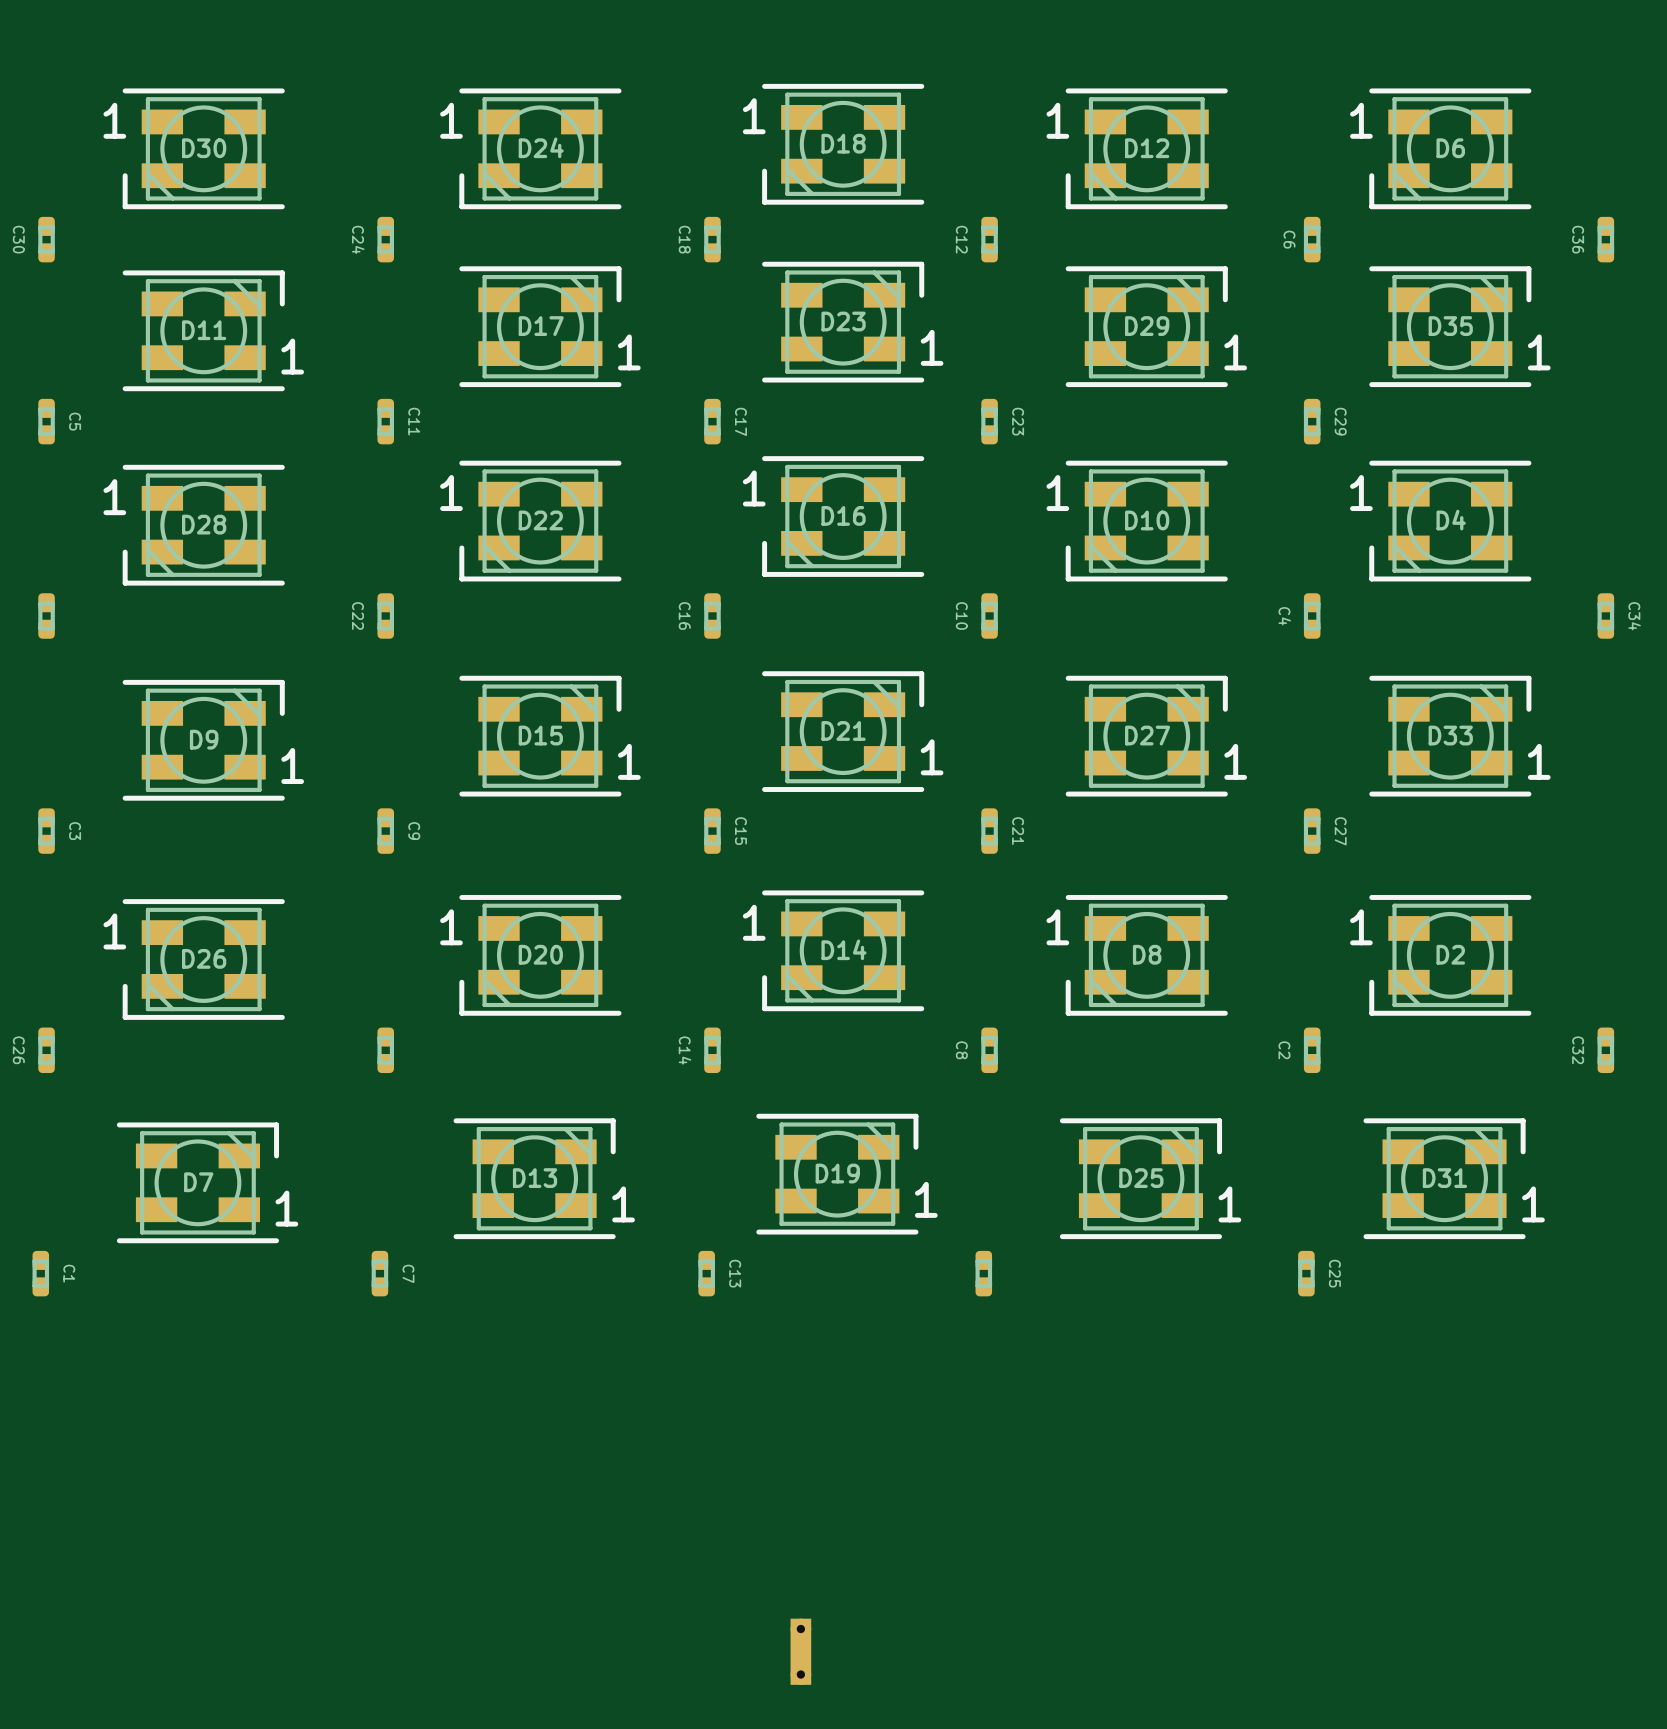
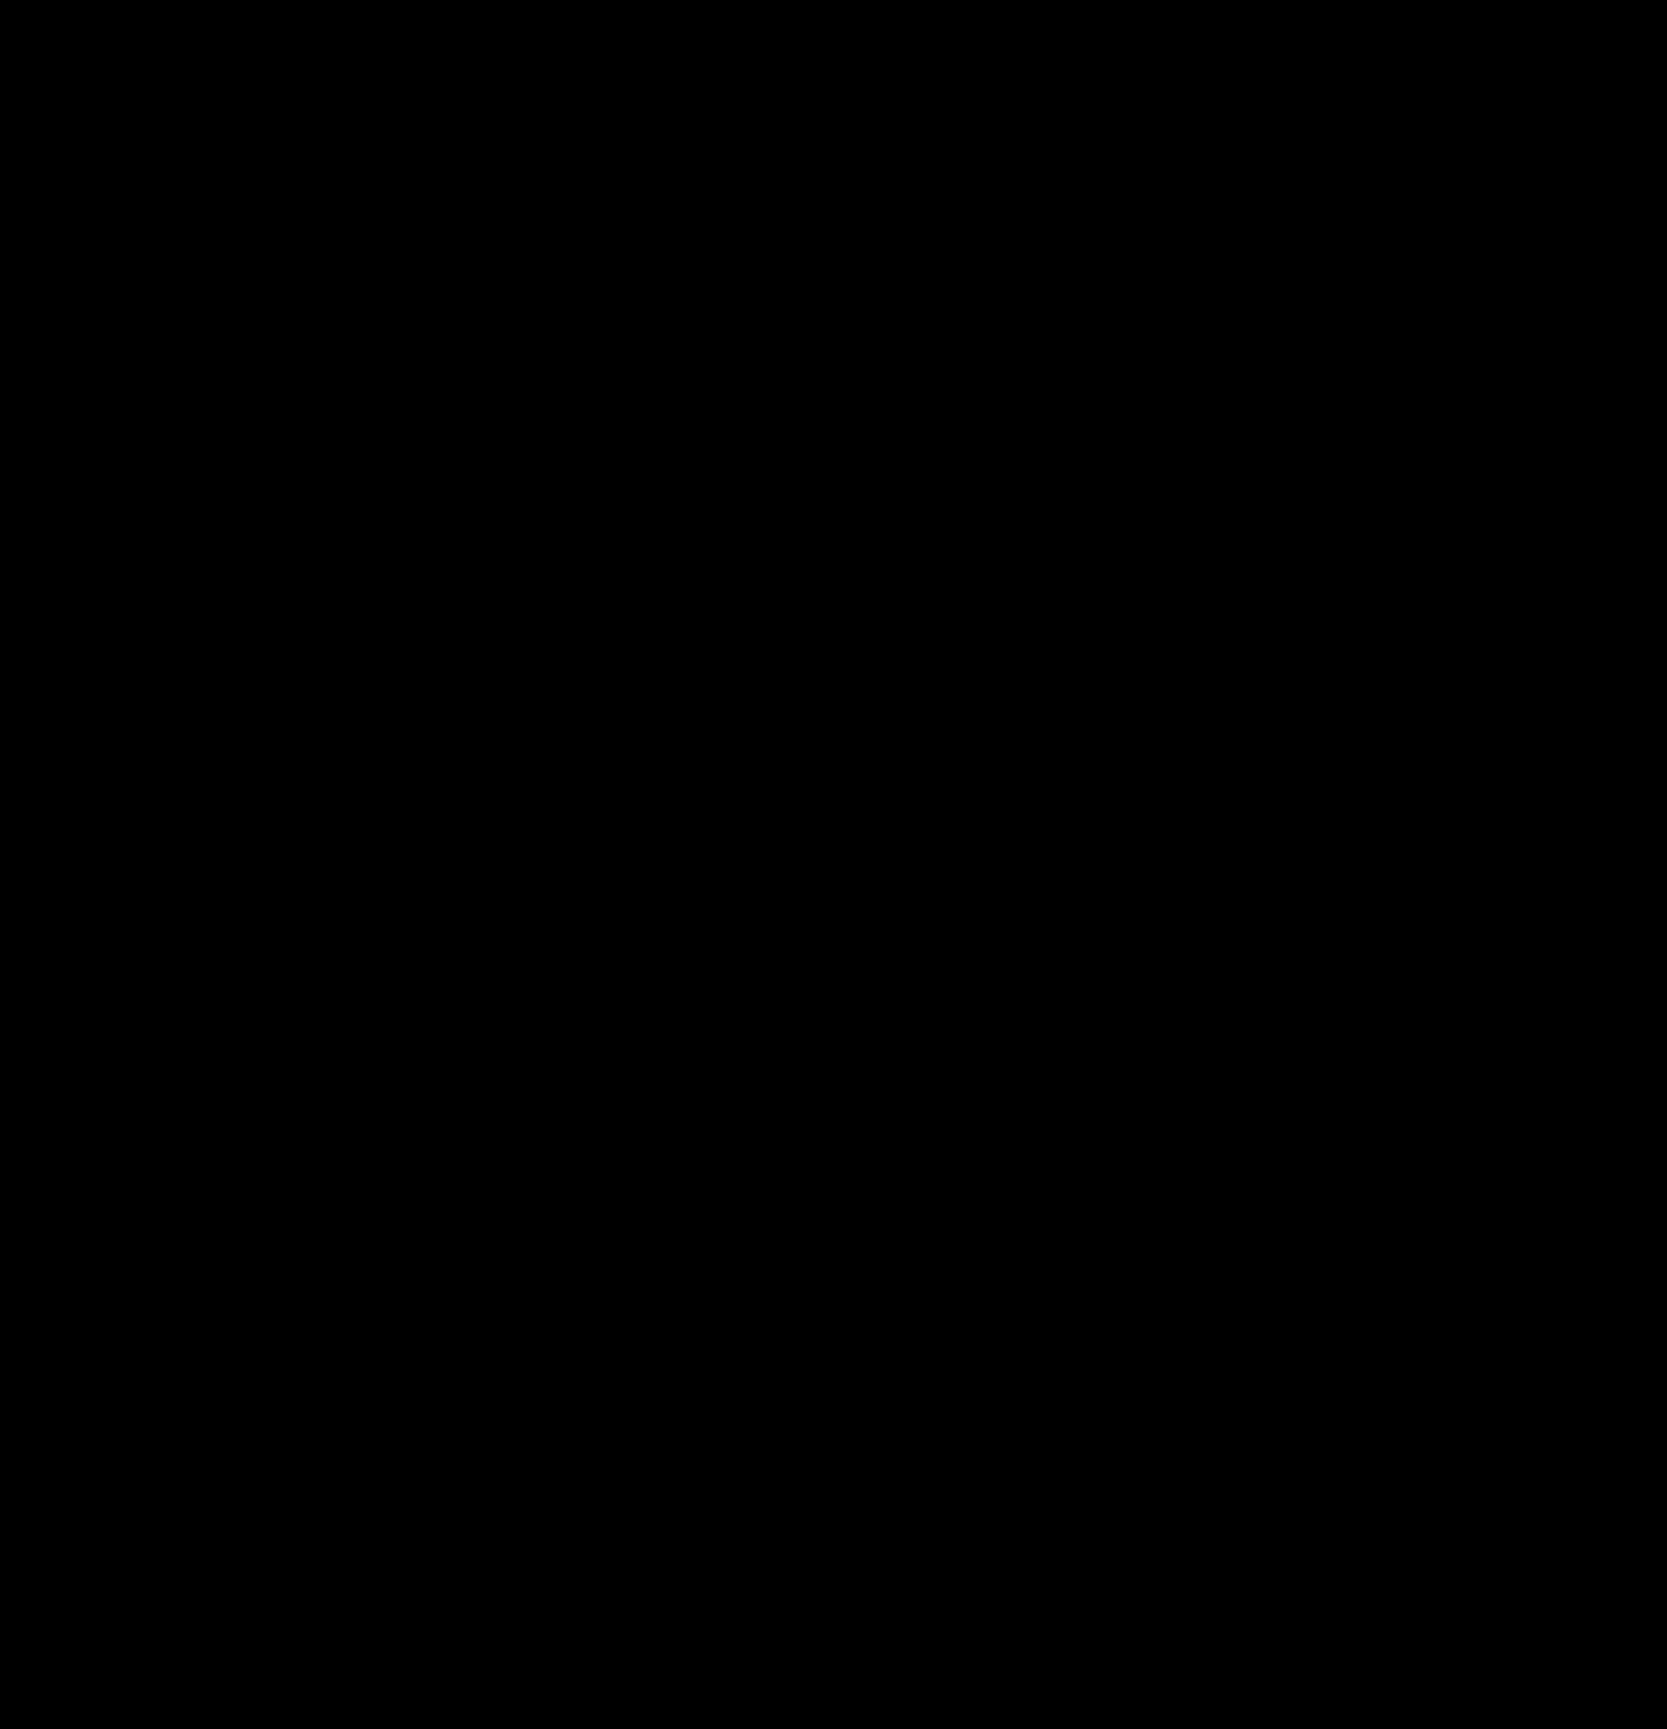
D18: (843, 144) -> none
D30: (203, 148) -> none
D24: (540, 148) -> none
D12: (1146, 148) -> none
D6: (1450, 148) -> none
C30: (46, 239) -> none
C24: (385, 239) -> none
C18: (712, 239) -> none
C12: (989, 239) -> none
C6: (1312, 239) -> none
C36: (1605, 239) -> none
D23: (843, 322) -> none
D17: (540, 326) -> none
D29: (1146, 326) -> none
D35: (1450, 326) -> none
D11: (203, 330) -> none
C5: (46, 421) -> none
C11: (385, 421) -> none
C17: (712, 421) -> none
C23: (989, 421) -> none
C29: (1312, 421) -> none
D16: (843, 516) -> none
D22: (540, 521) -> none
D10: (1146, 521) -> none
D4: (1450, 521) -> none
D28: (203, 525) -> none
part: (46, 616) -> none
C22: (385, 616) -> none
C16: (712, 616) -> none
C10: (989, 616) -> none
C4: (1312, 616) -> none
C34: (1605, 616) -> none
D21: (843, 731) -> none
D15: (540, 736) -> none
D27: (1146, 736) -> none
D33: (1450, 736) -> none
D9: (203, 740) -> none
C3: (46, 831) -> none
C9: (385, 831) -> none
C15: (712, 831) -> none
C21: (989, 831) -> none
C27: (1312, 831) -> none
D14: (843, 950) -> none
D20: (540, 955) -> none
D8: (1146, 955) -> none
D2: (1450, 955) -> none
D26: (203, 959) -> none
C26: (46, 1050) -> none
part: (385, 1050) -> none
C14: (712, 1050) -> none
C8: (989, 1050) -> none
C2: (1312, 1050) -> none
C32: (1605, 1050) -> none
D19: (837, 1174) -> none
D13: (534, 1178) -> none
D25: (1140, 1178) -> none
D31: (1444, 1178) -> none
D7: (197, 1182) -> none
C1: (40, 1273) -> none
C7: (379, 1273) -> none
C13: (706, 1273) -> none
part: (983, 1273) -> none
C25: (1306, 1273) -> none
part: (800, 1651) -> none

